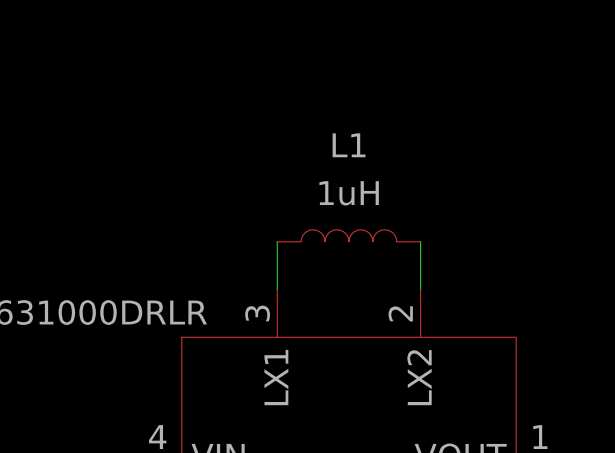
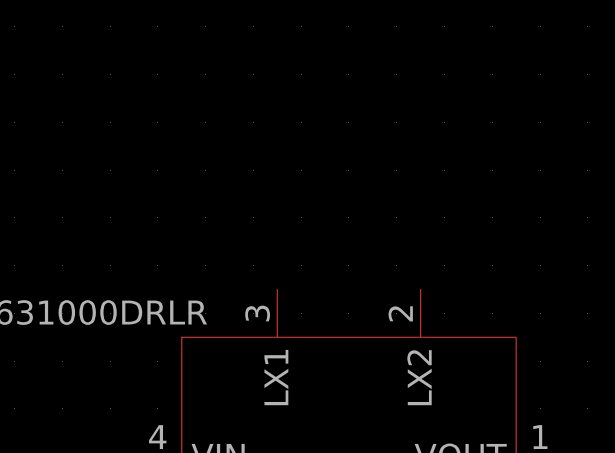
L1: 1uH (348, 235) -> none
wire: (277, 241) (277, 289) -> none
wire: (420, 241) (420, 289) -> none

